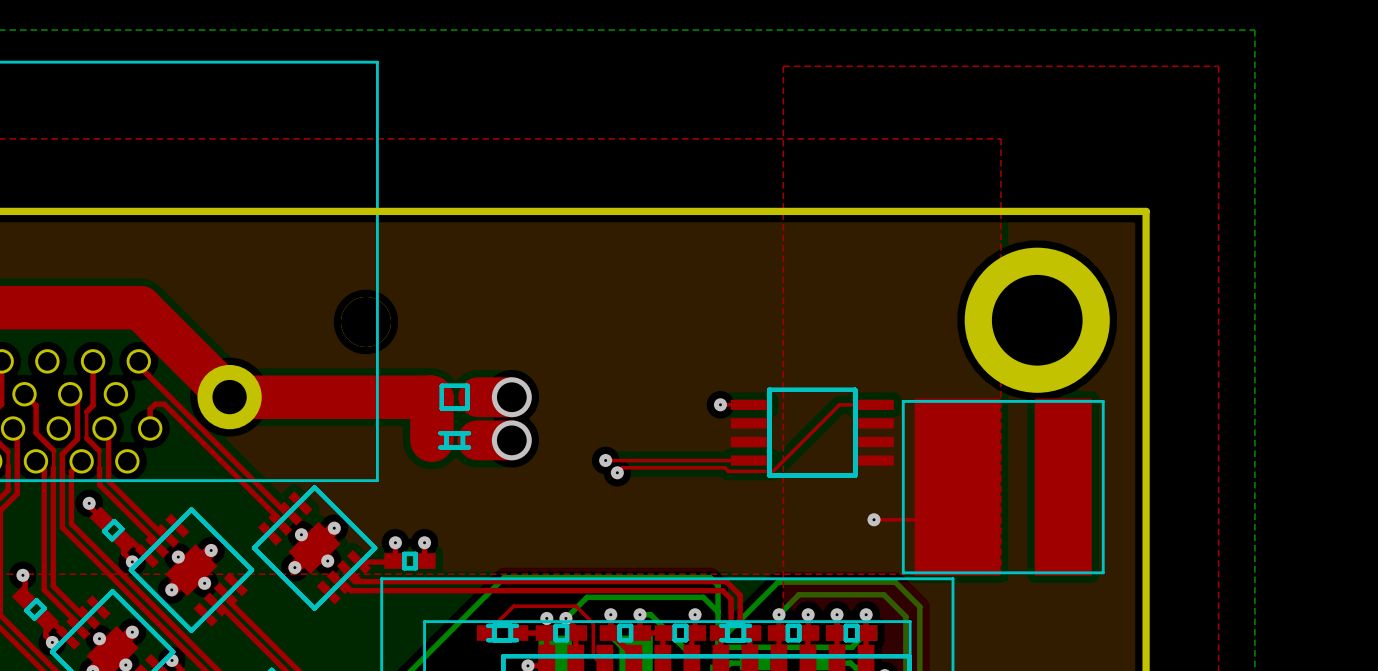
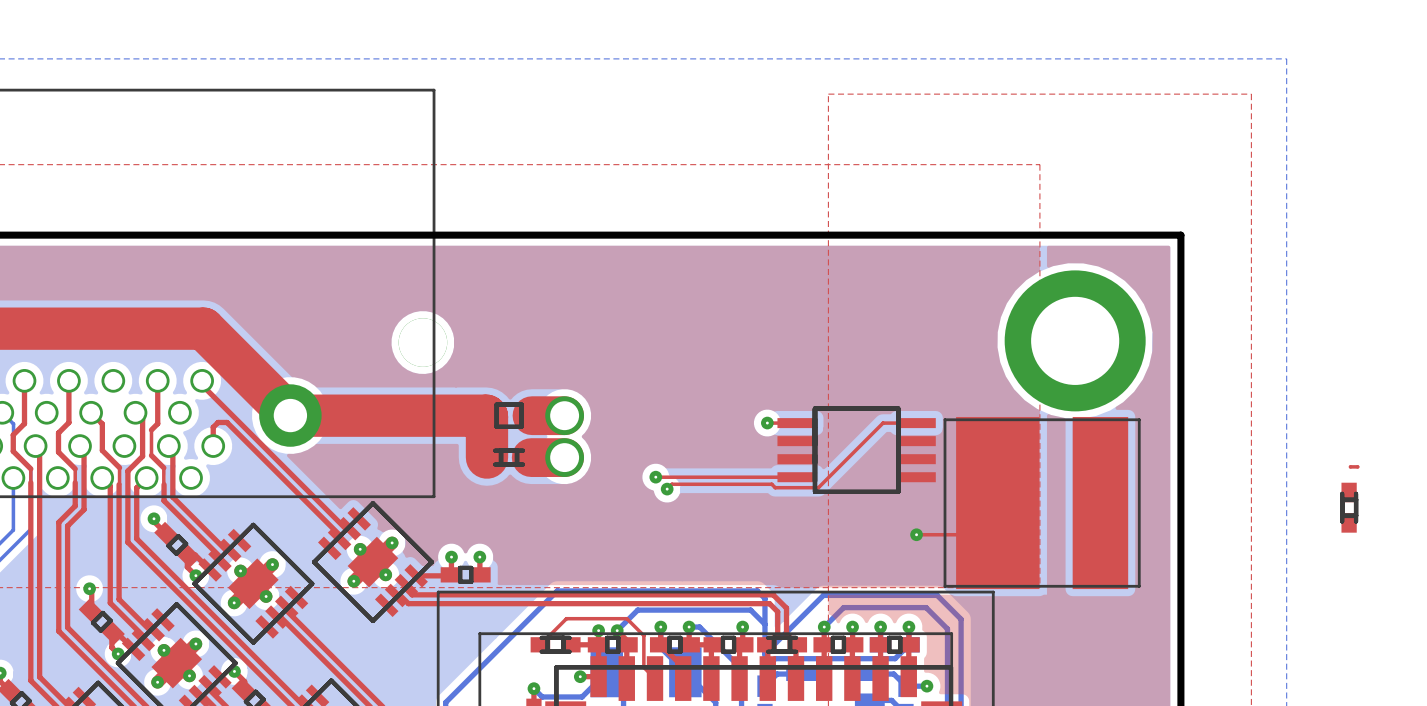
part: none -> (1354, 466)
part: none -> (1349, 507)

